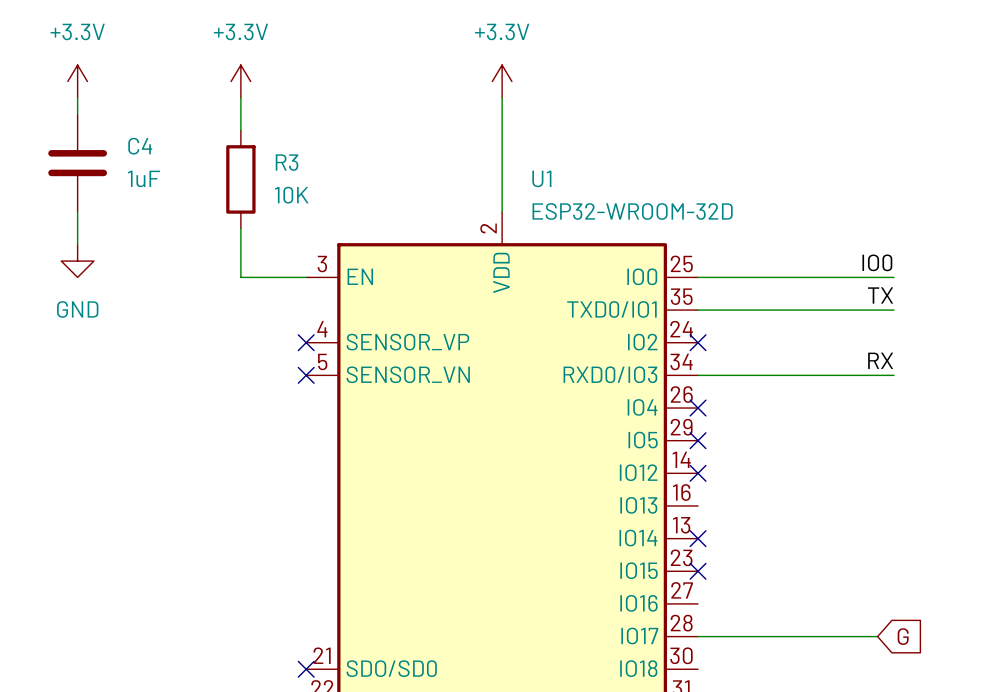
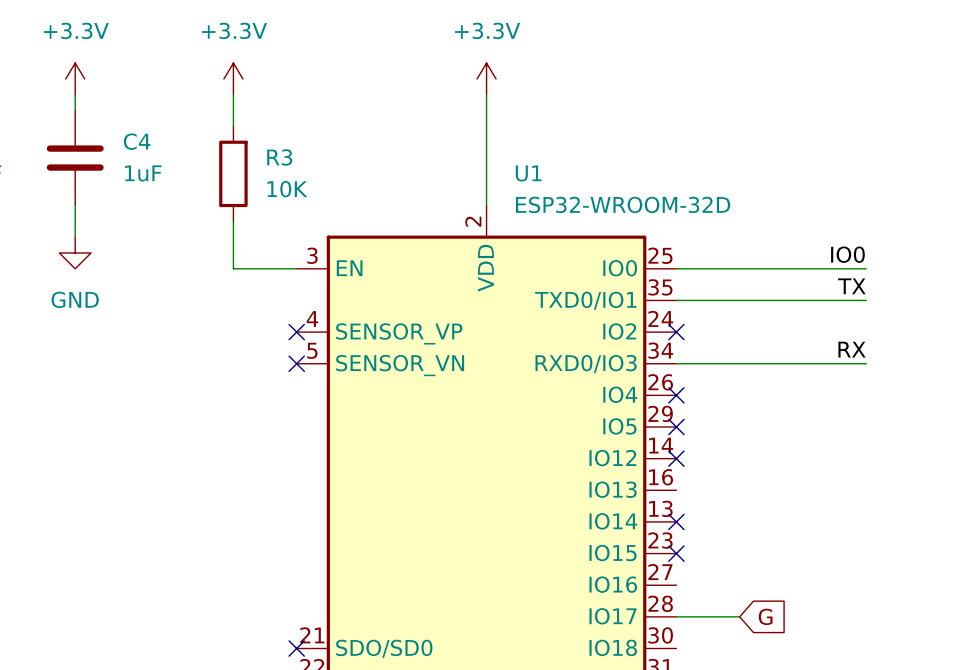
wire: (763, 636) (877, 636) -> none
global label position: G (903, 636) -> G (765, 616)

